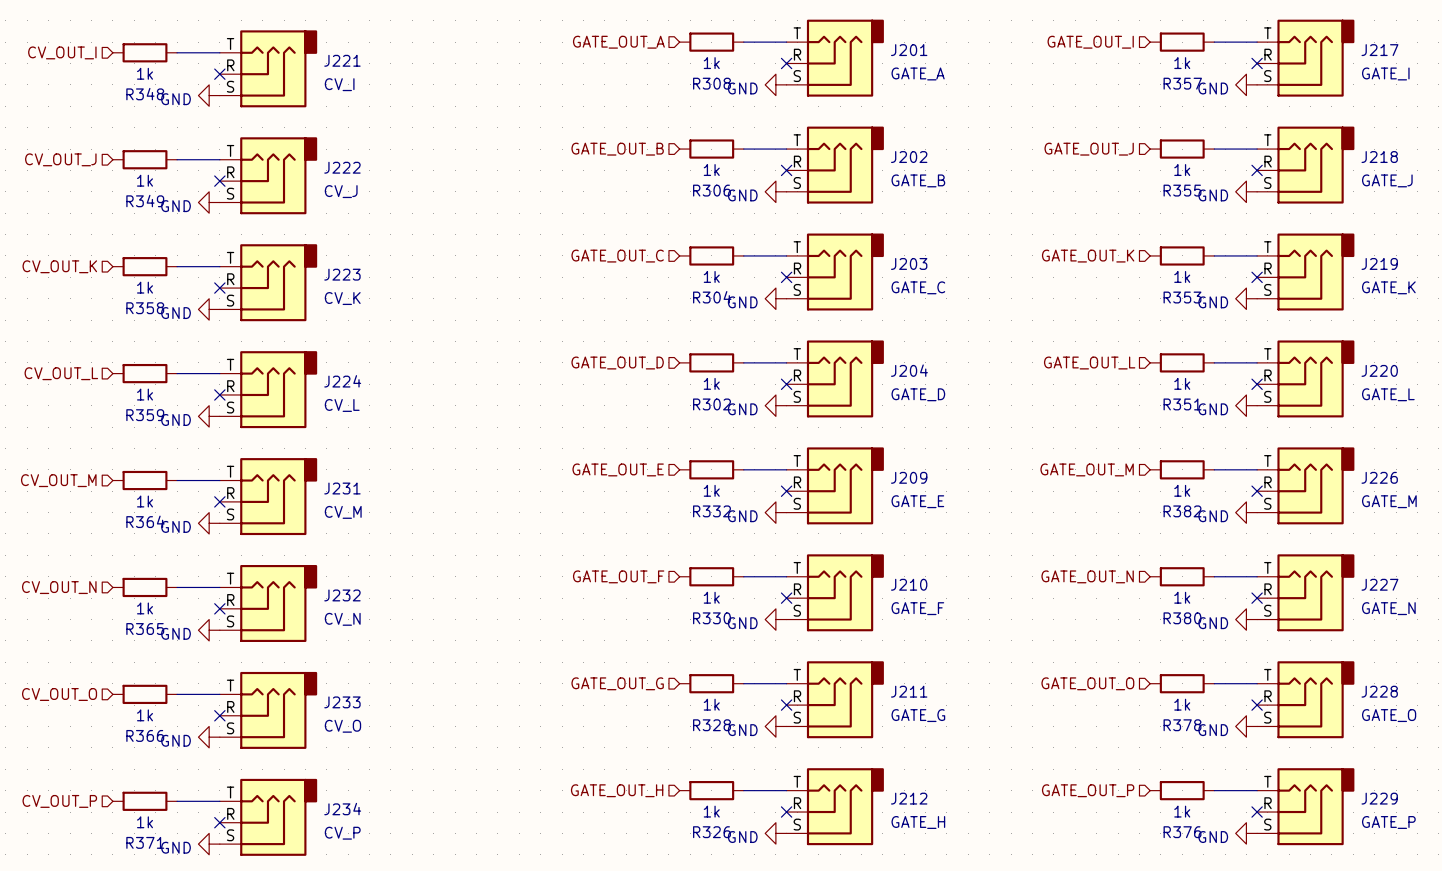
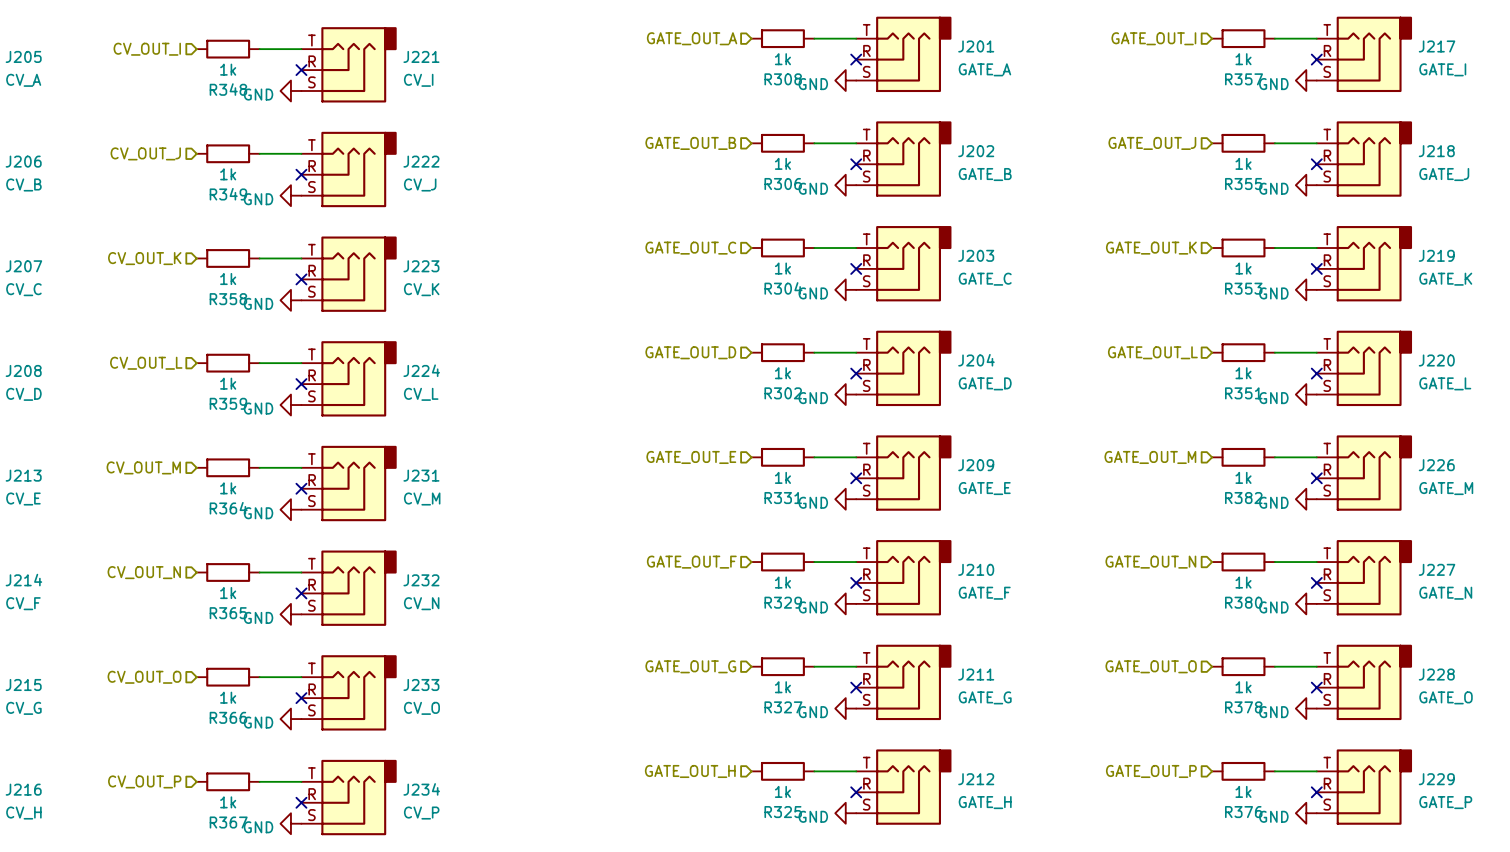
R332 name: R332 (712, 511) -> R331 (783, 498)
R330 name: R330 (712, 618) -> R329 (783, 602)
R328 name: R328 (712, 725) -> R327 (783, 707)
R326 name: R326 (712, 832) -> R325 (783, 812)
R371 name: R371 (145, 842) -> R367 (228, 822)

